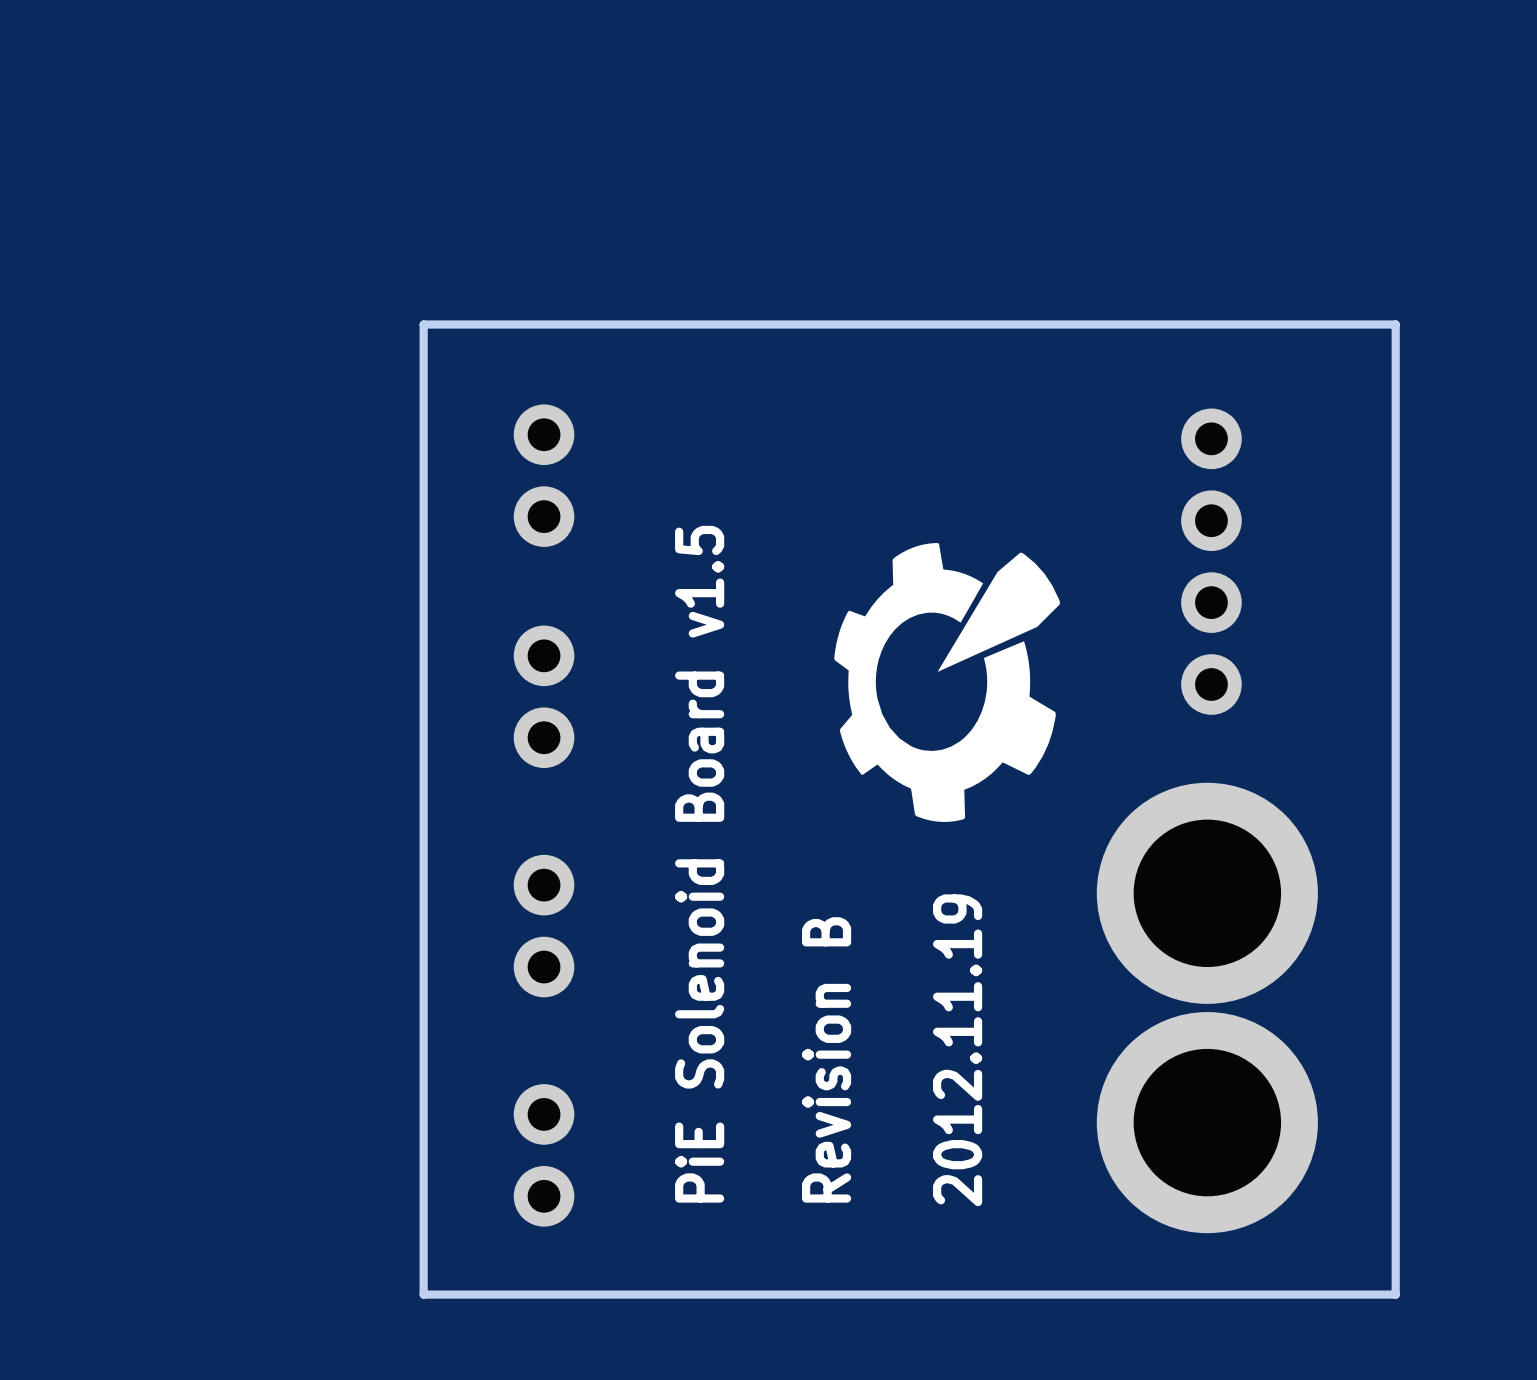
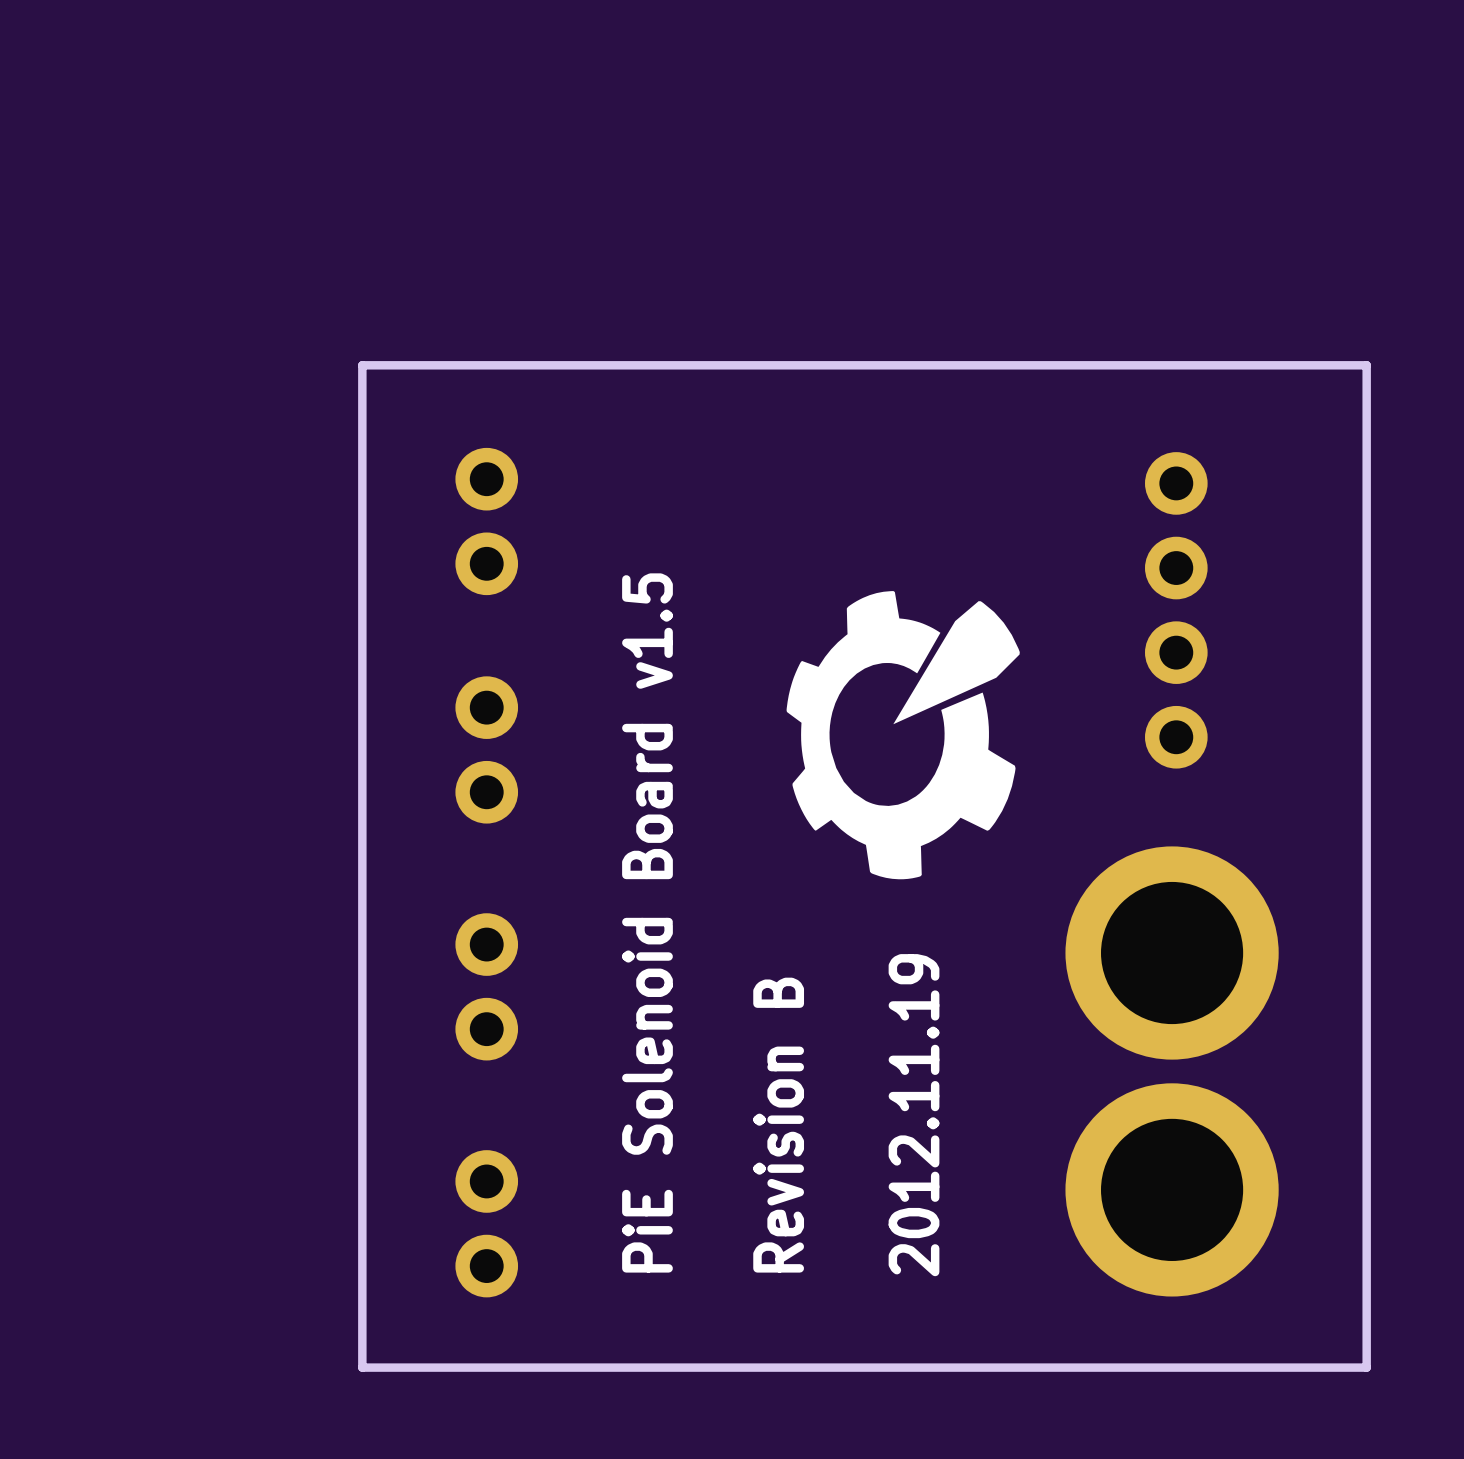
part footprint: [1096, 782, 1318, 1234] -> [1065, 846, 1279, 1297]

